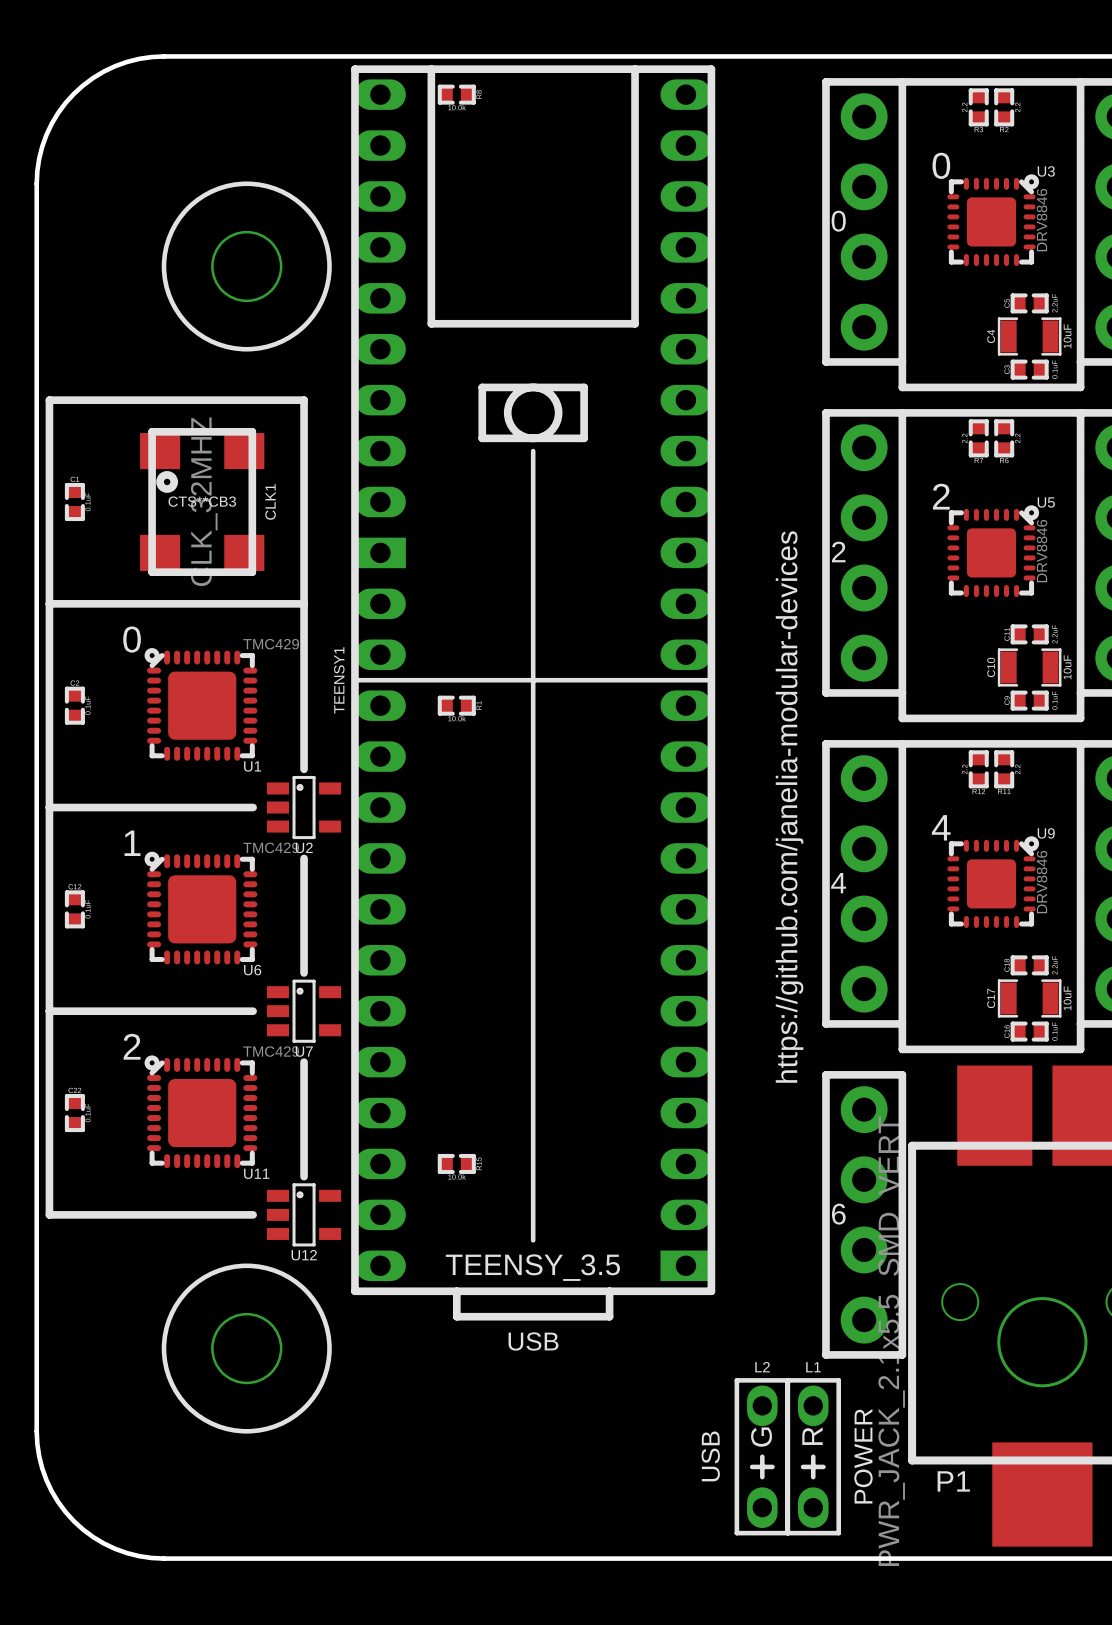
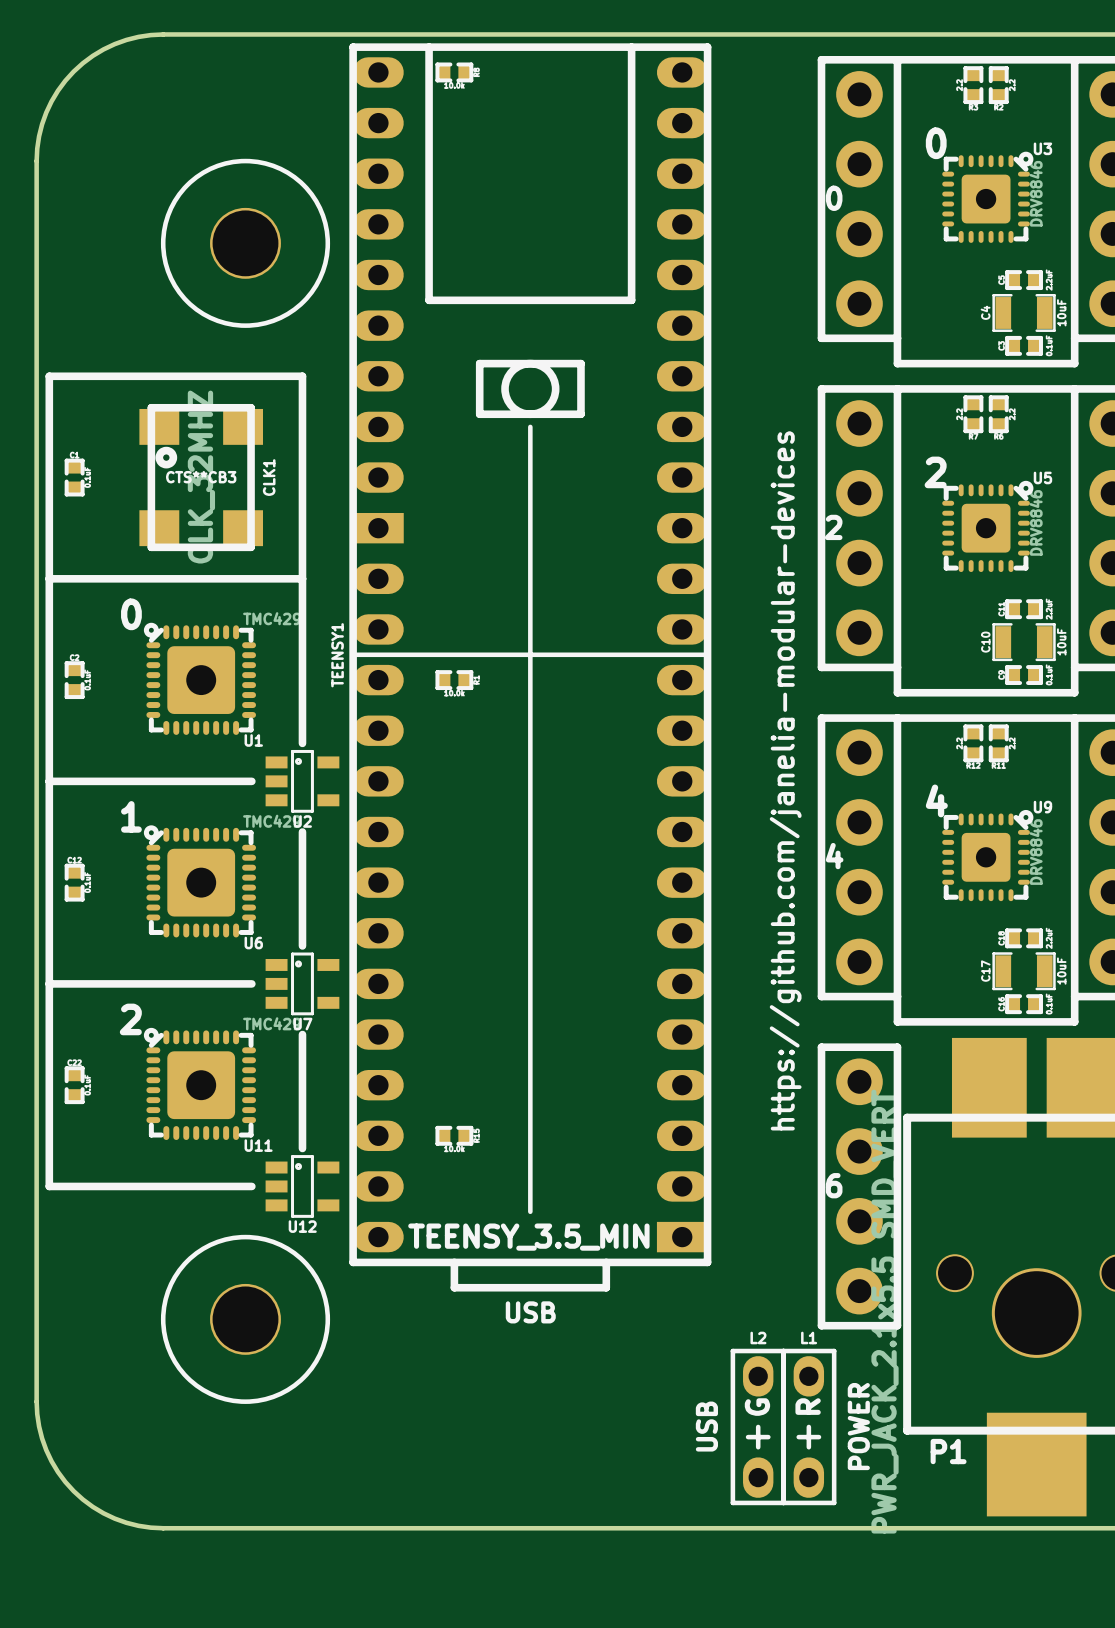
U3 footprint: [947, 174, 1040, 267] -> [942, 151, 1034, 243]
U5 footprint: [947, 505, 1040, 598] -> [942, 480, 1034, 573]
U1 footprint: [144, 648, 258, 761] -> [143, 622, 257, 735]
U9 footprint: [947, 836, 1040, 929] -> [942, 809, 1034, 902]
U6 footprint: [144, 851, 258, 965] -> [143, 825, 257, 938]
U11 footprint: [144, 1055, 258, 1169] -> [143, 1027, 257, 1141]
TEENSY1 value: TEENSY_3.5 (532, 1267) -> TEENSY_3.5_MIN (528, 1237)

